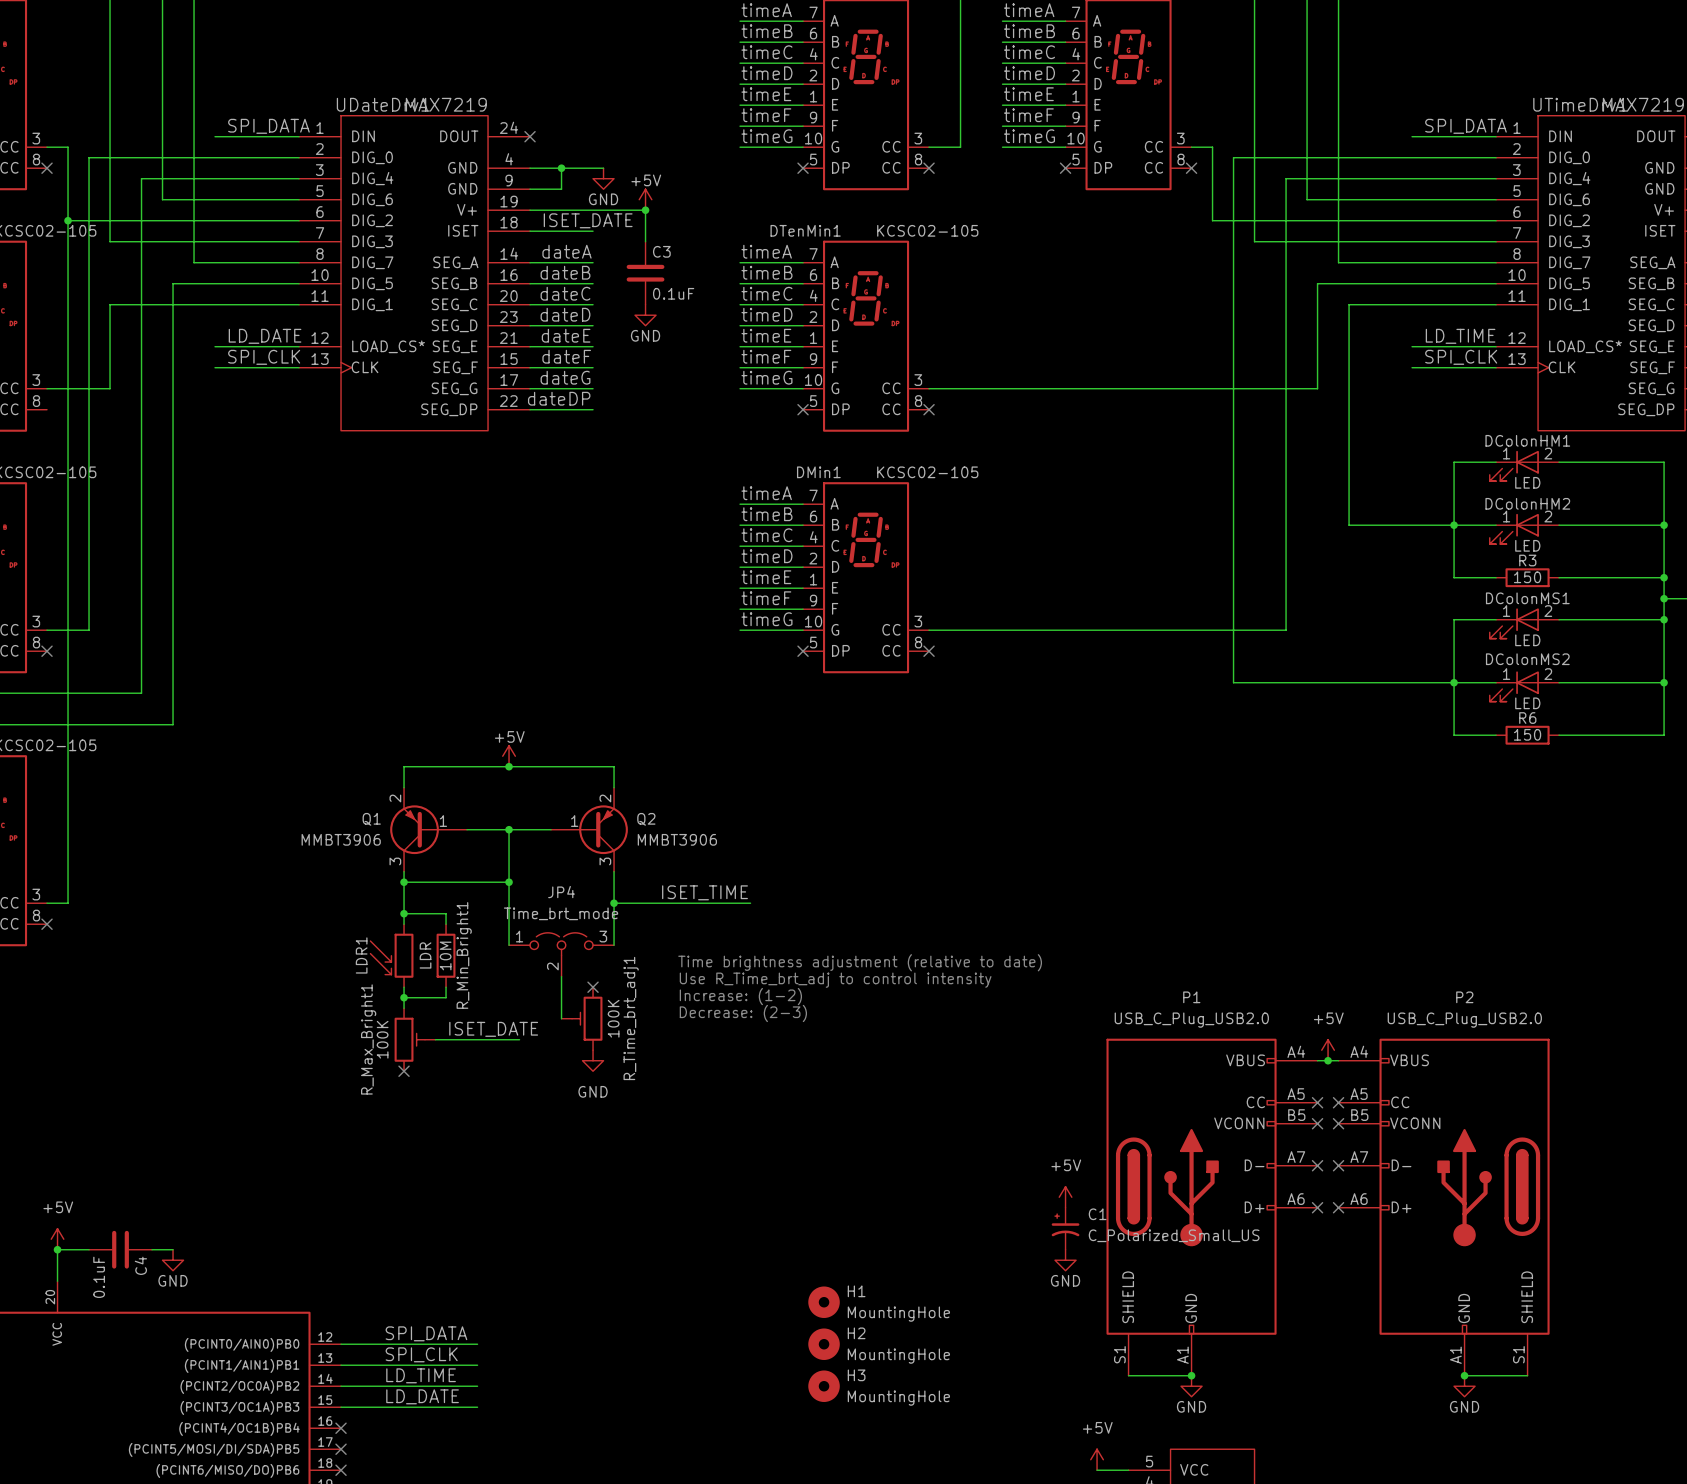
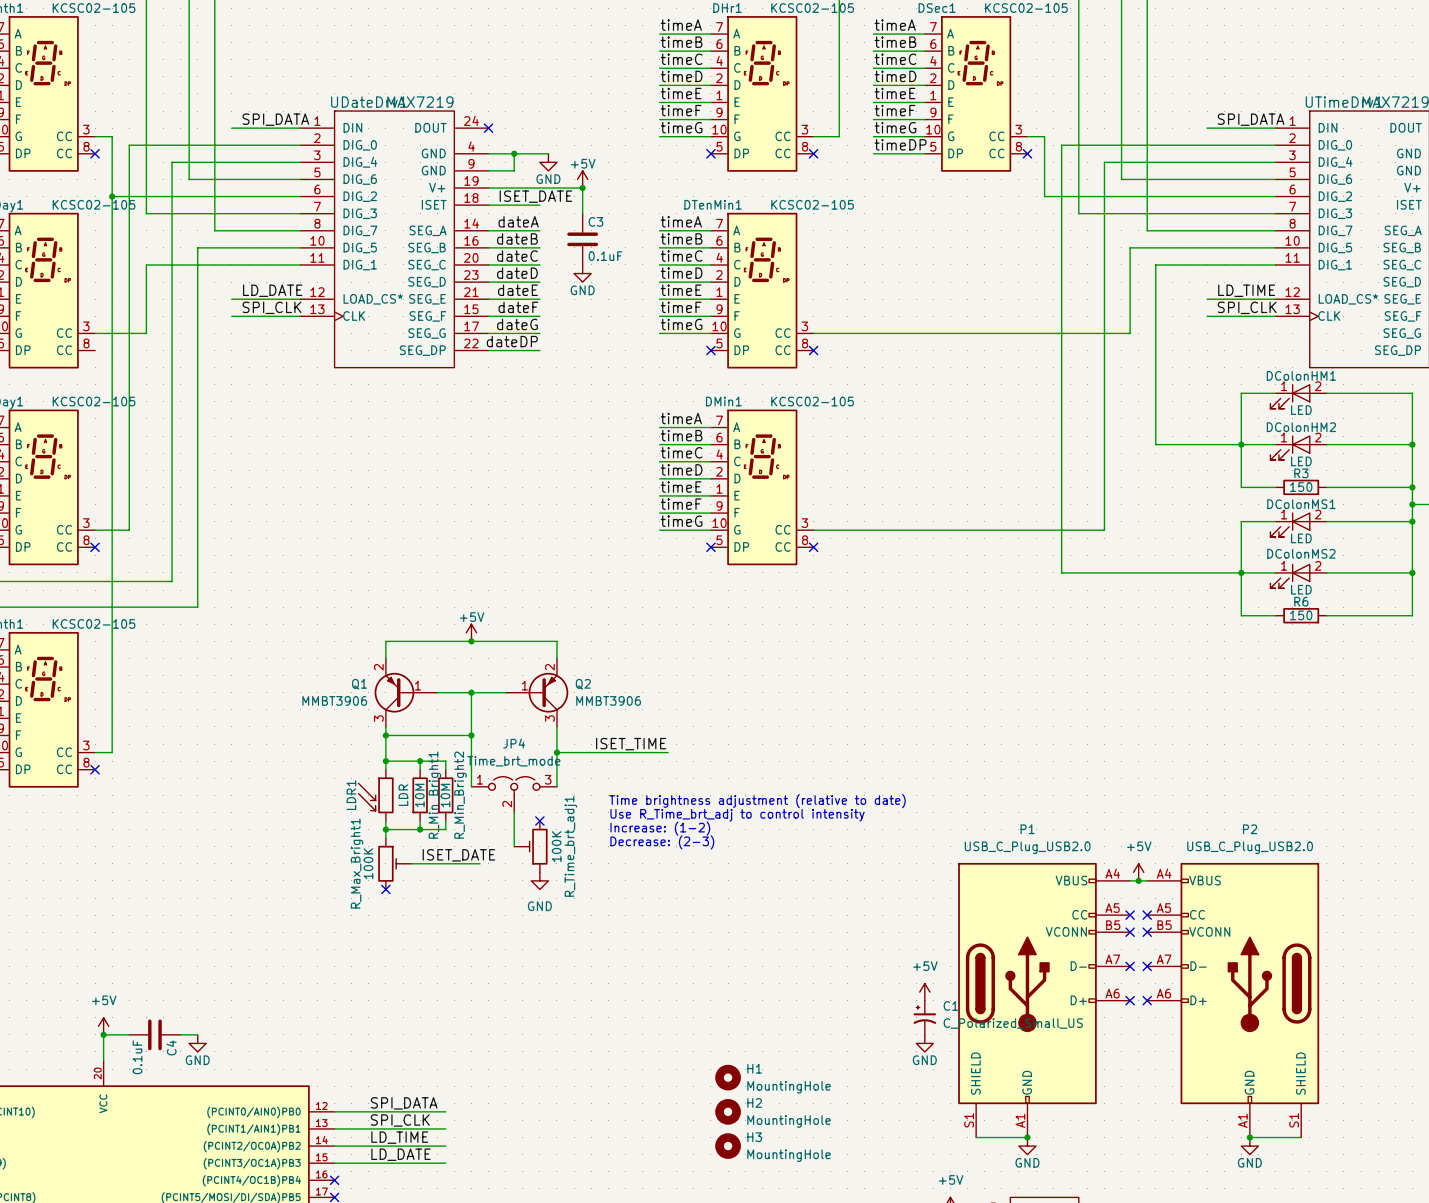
label: none -> timeDP (900, 144)
wire: none -> (873, 153) (924, 153)
no-connect mark: (1065, 168) -> none
wire: none -> (420, 761) (445, 761) (445, 769)
junction: none -> (420, 761)
R_Min_Bright2: none -> 10M (445, 795)
wire: none -> (445, 821) (445, 829) (420, 829)
junction: none -> (420, 829)

